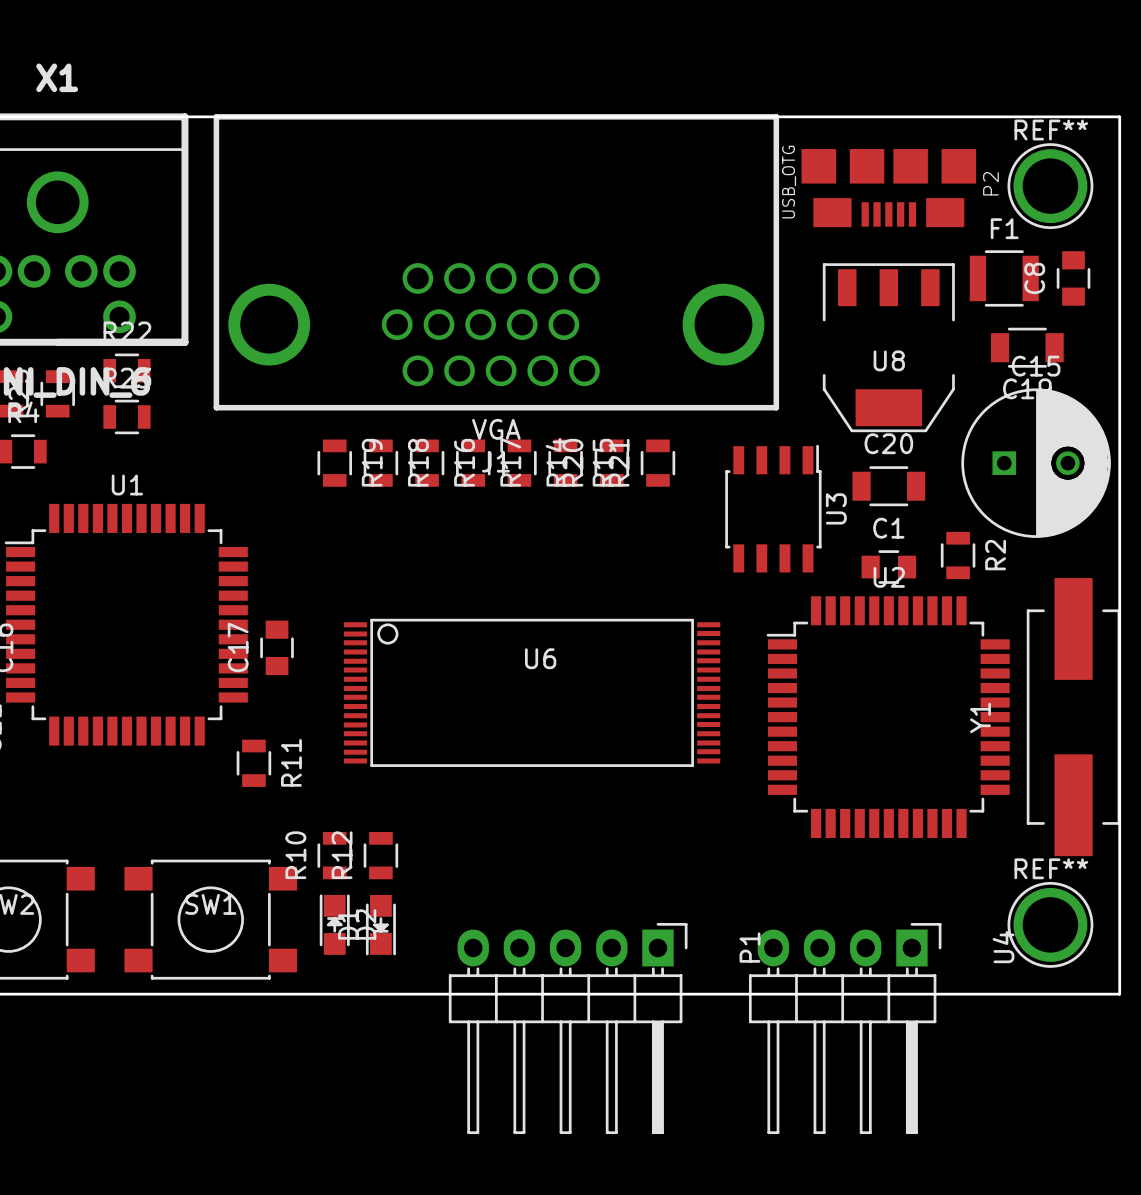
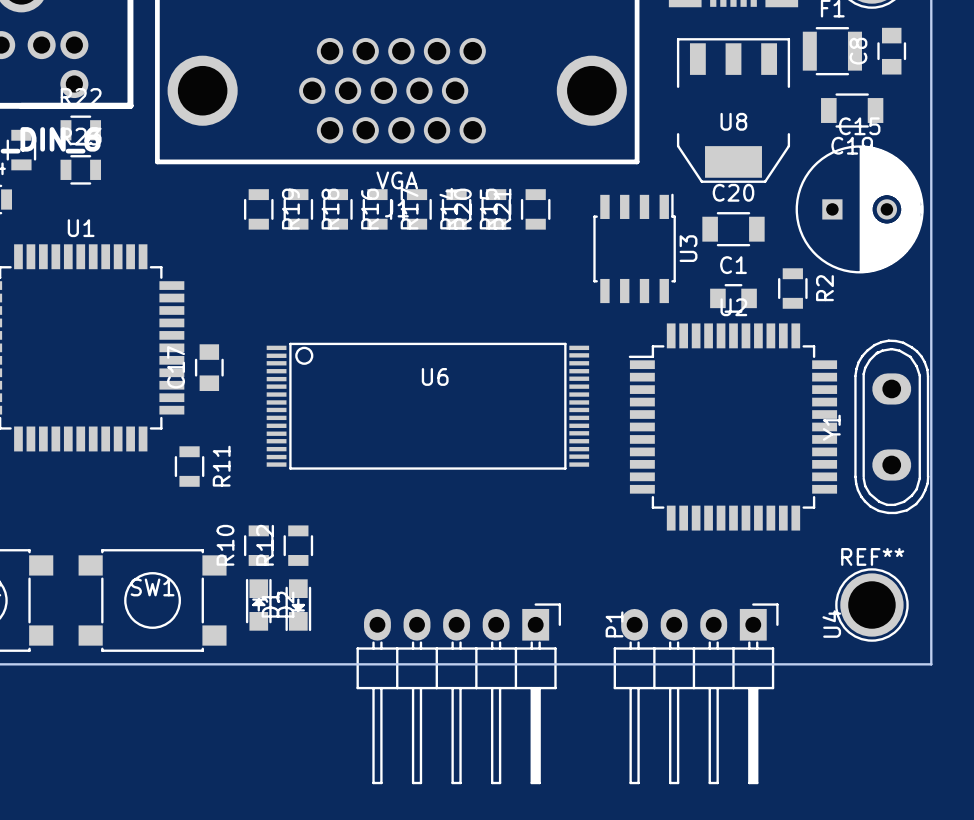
Y1 footprint: [1026, 578, 1121, 857] -> [854, 339, 930, 515]

